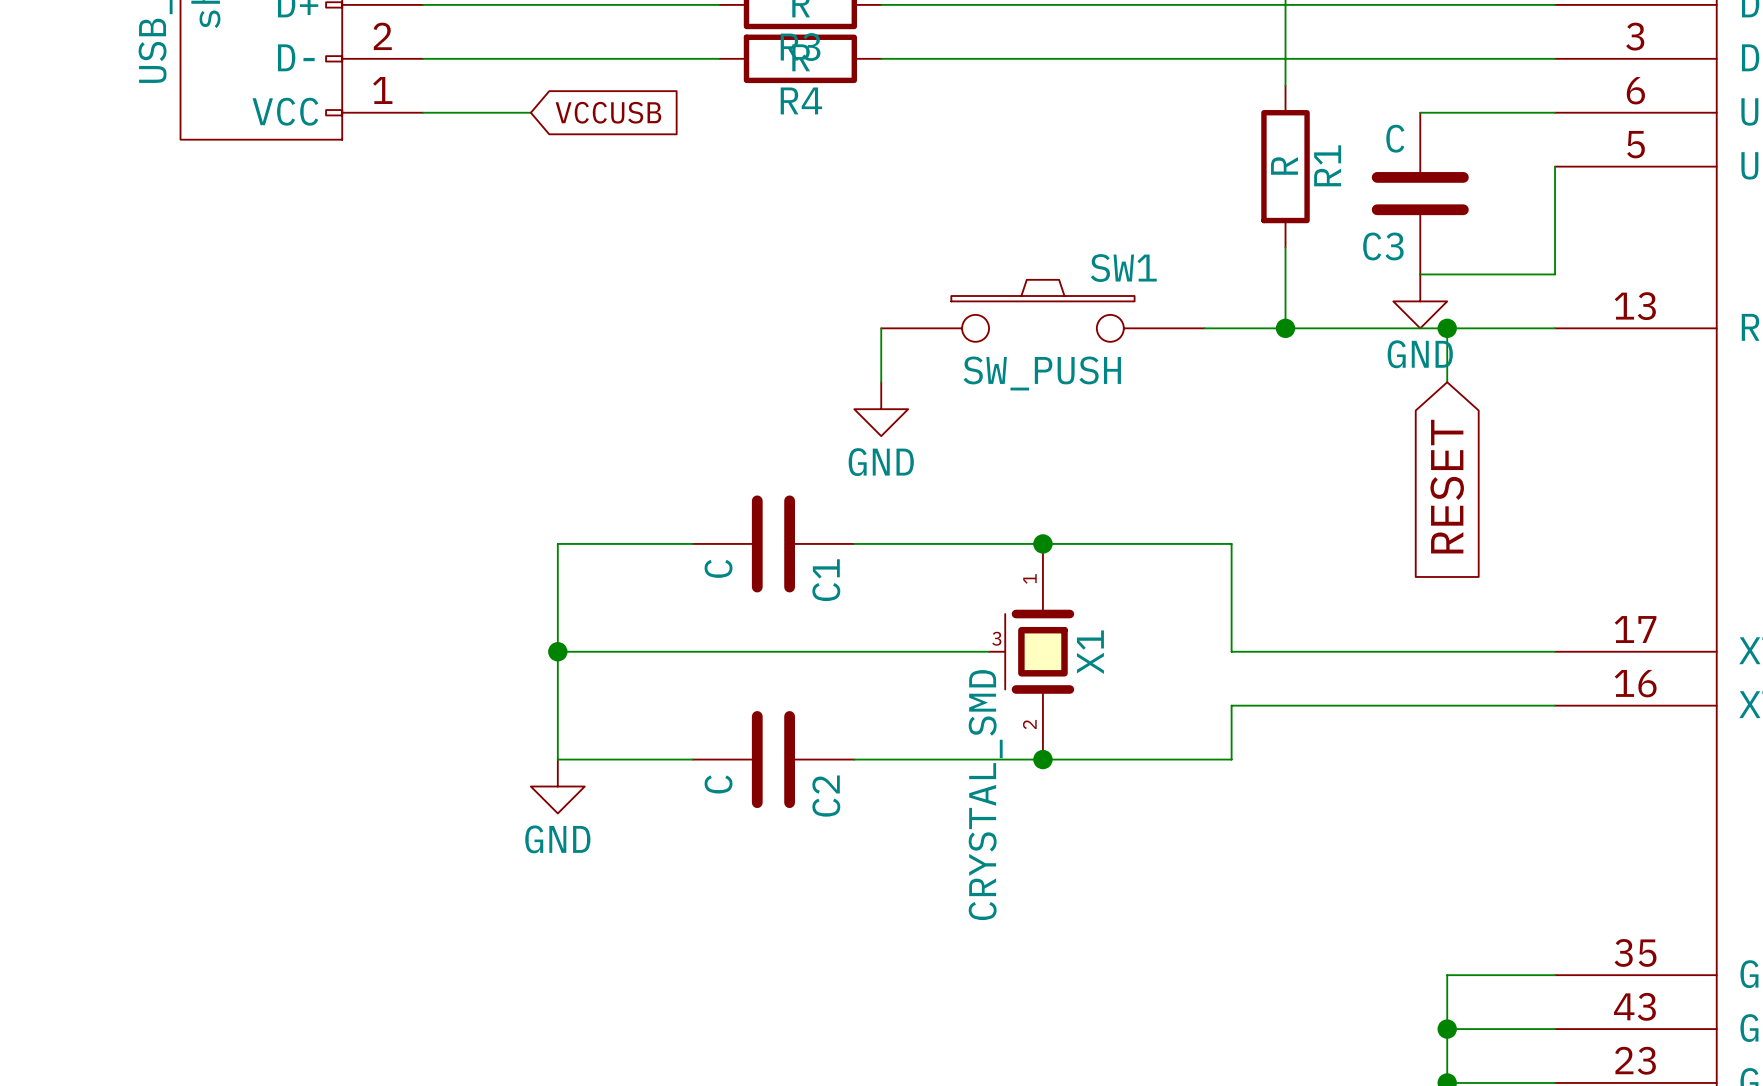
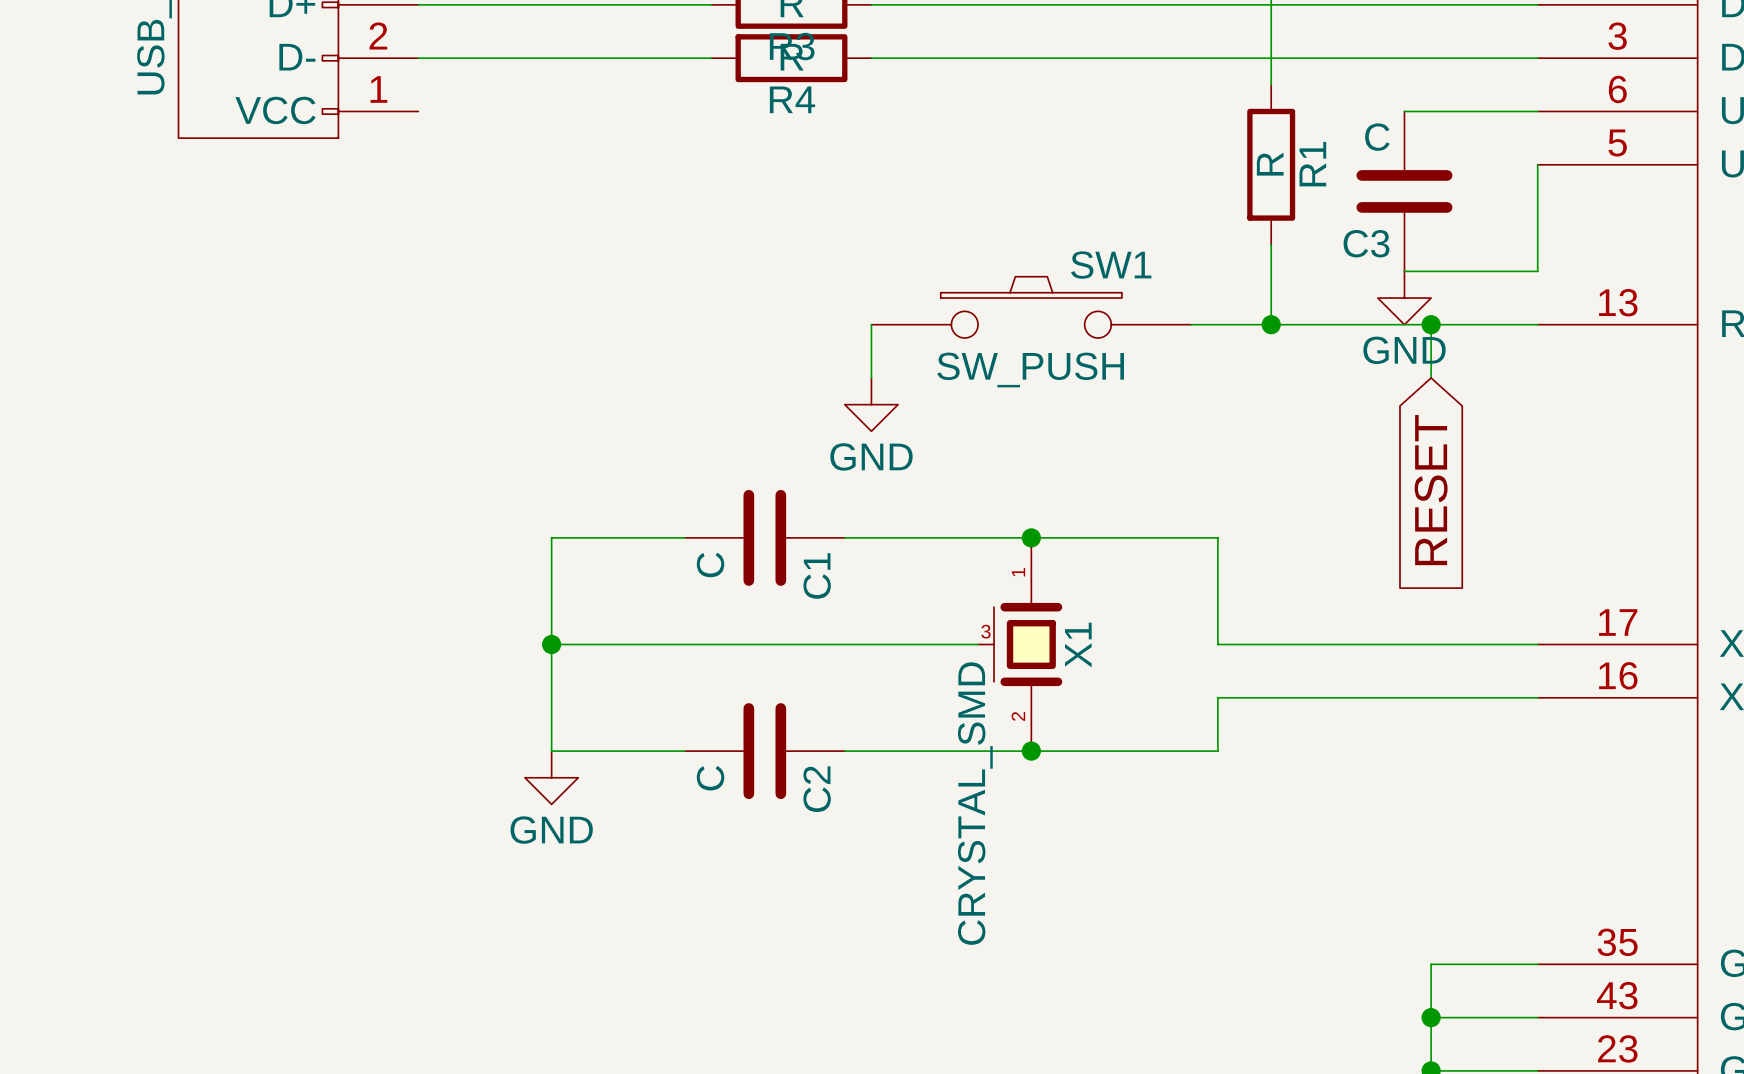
wire: (423, 112) (530, 112) -> none
global label: VCCUSB (608, 112) -> none

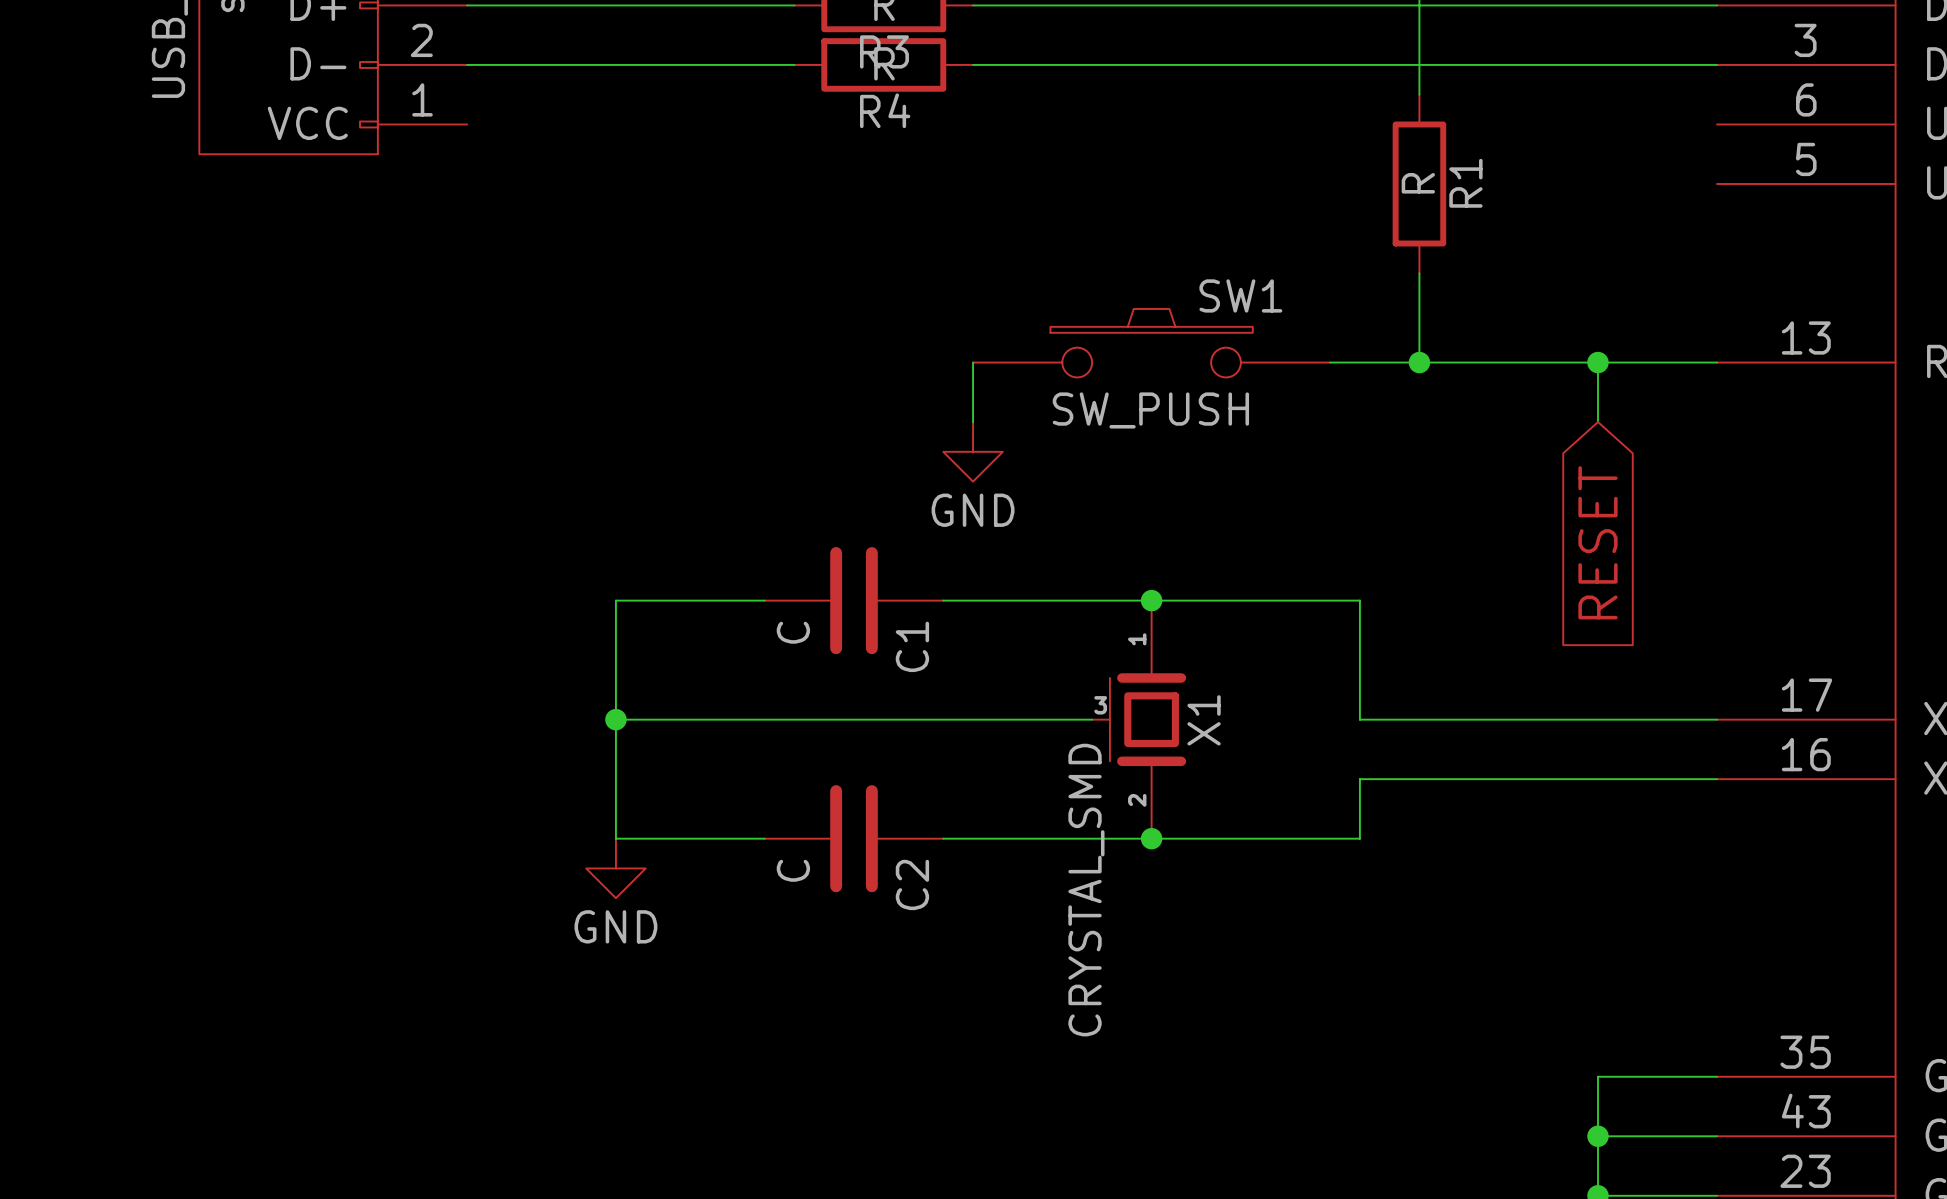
wire: (1404, 111) (1537, 111) -> none
wire: (1537, 164) (1537, 271) (1404, 271) -> none
C3: C (1404, 191) -> none
power symbol: GND (1404, 298) -> none

